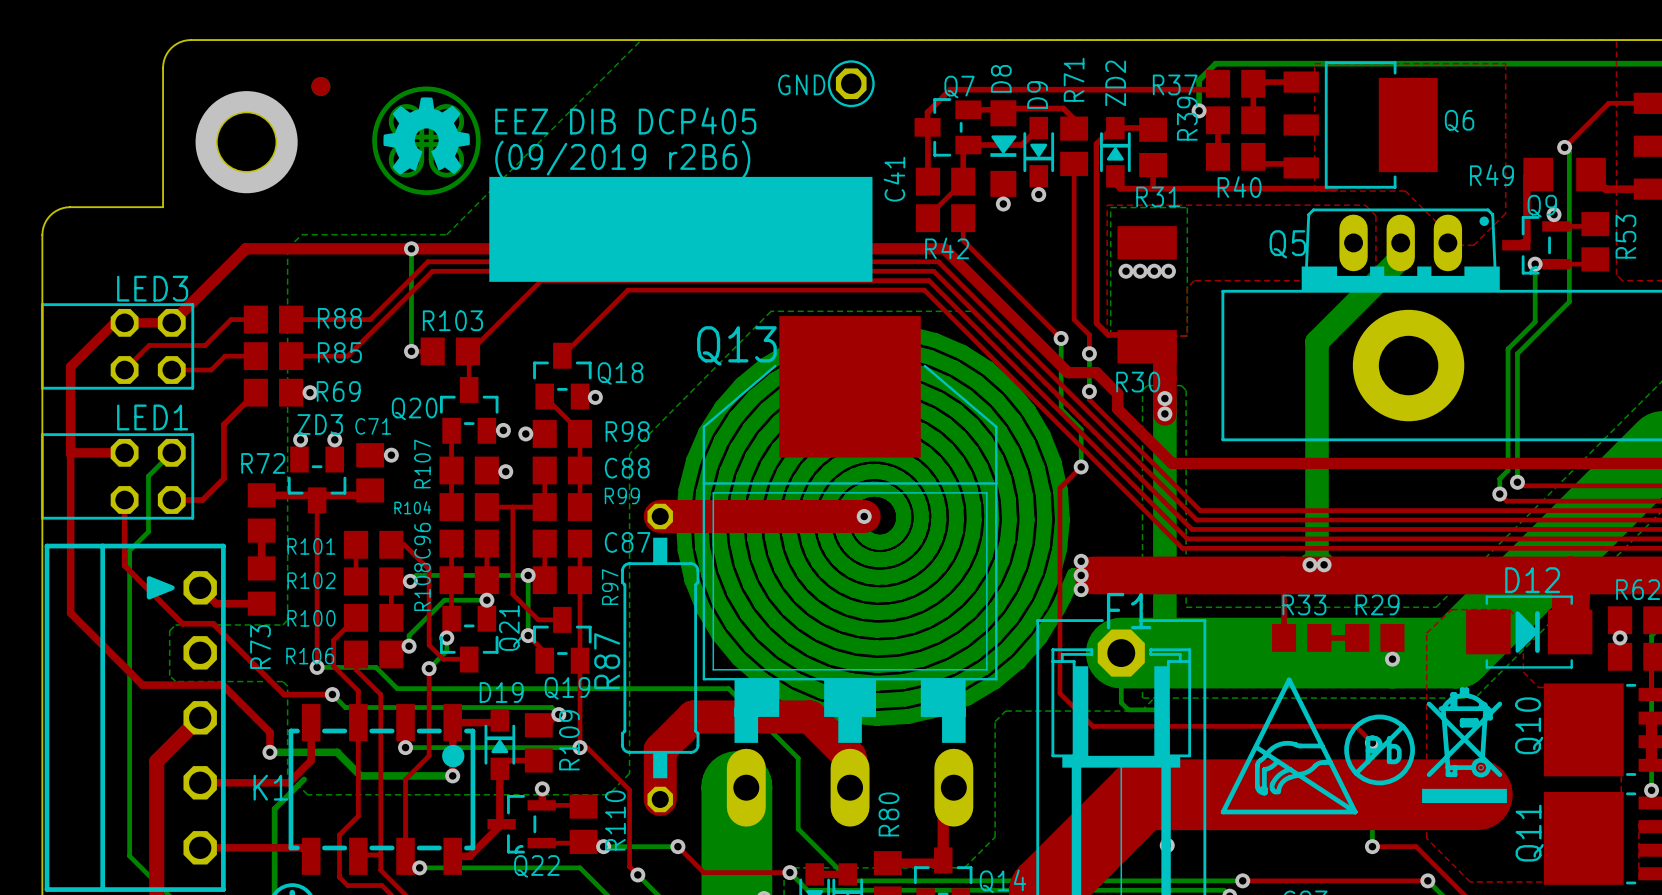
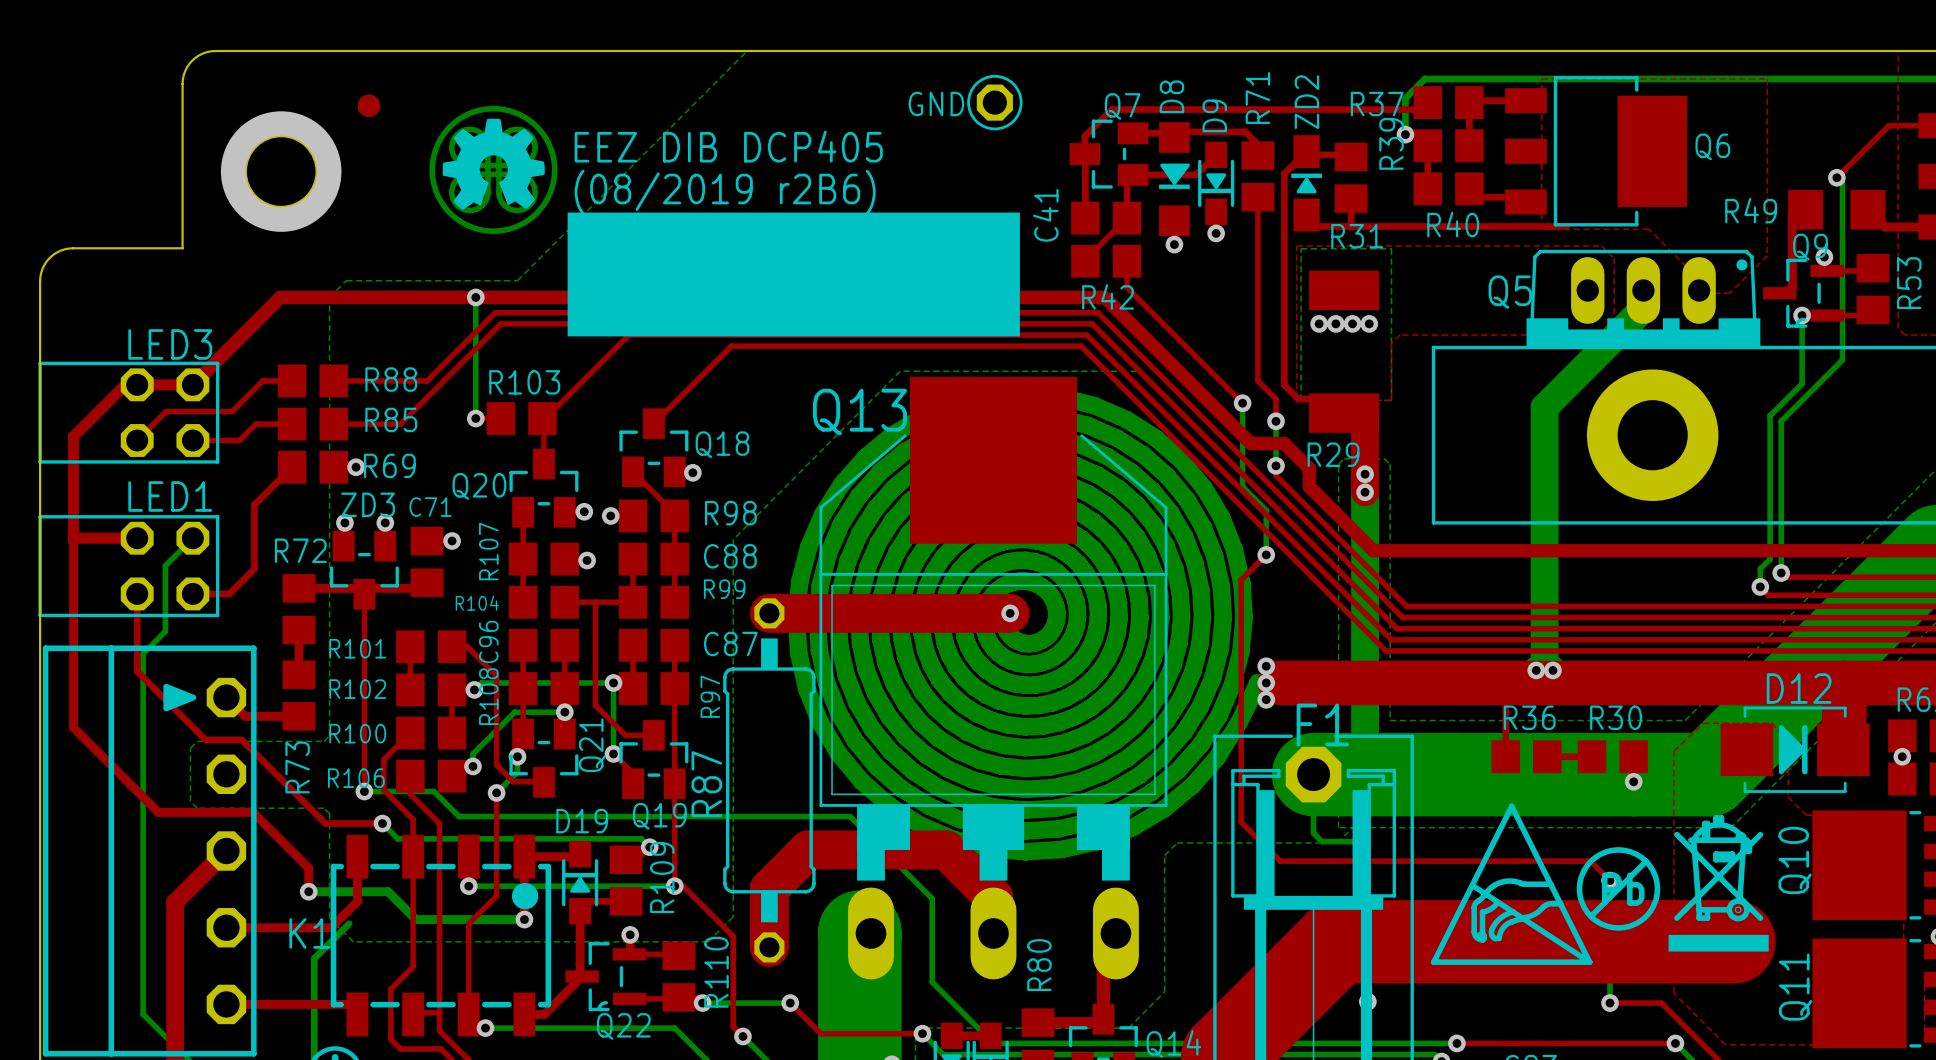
ZD2 footprint: [1100, 116, 1131, 188] -> [1291, 135, 1322, 232]
text: (09/2019 r2B6) (622, 159) -> (08/2019 r2B6) (725, 192)
R30 name: R30 (1138, 382) -> R29 (1333, 454)
R33 name: R33 (1304, 604) -> R36 (1529, 717)
R29 name: R29 (1377, 604) -> R30 (1616, 717)

